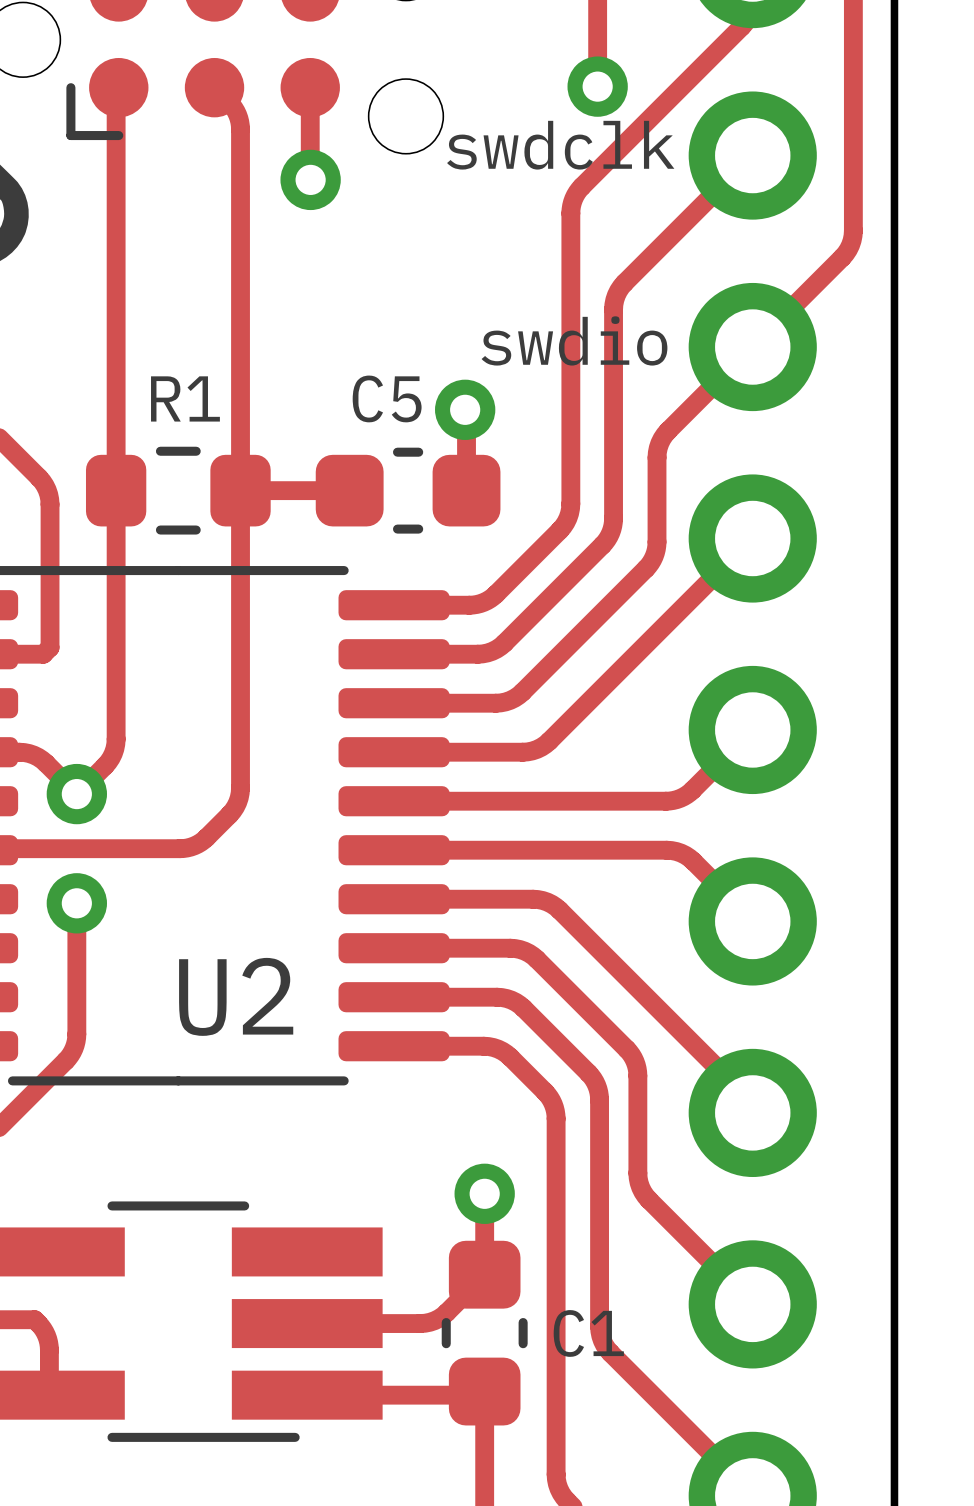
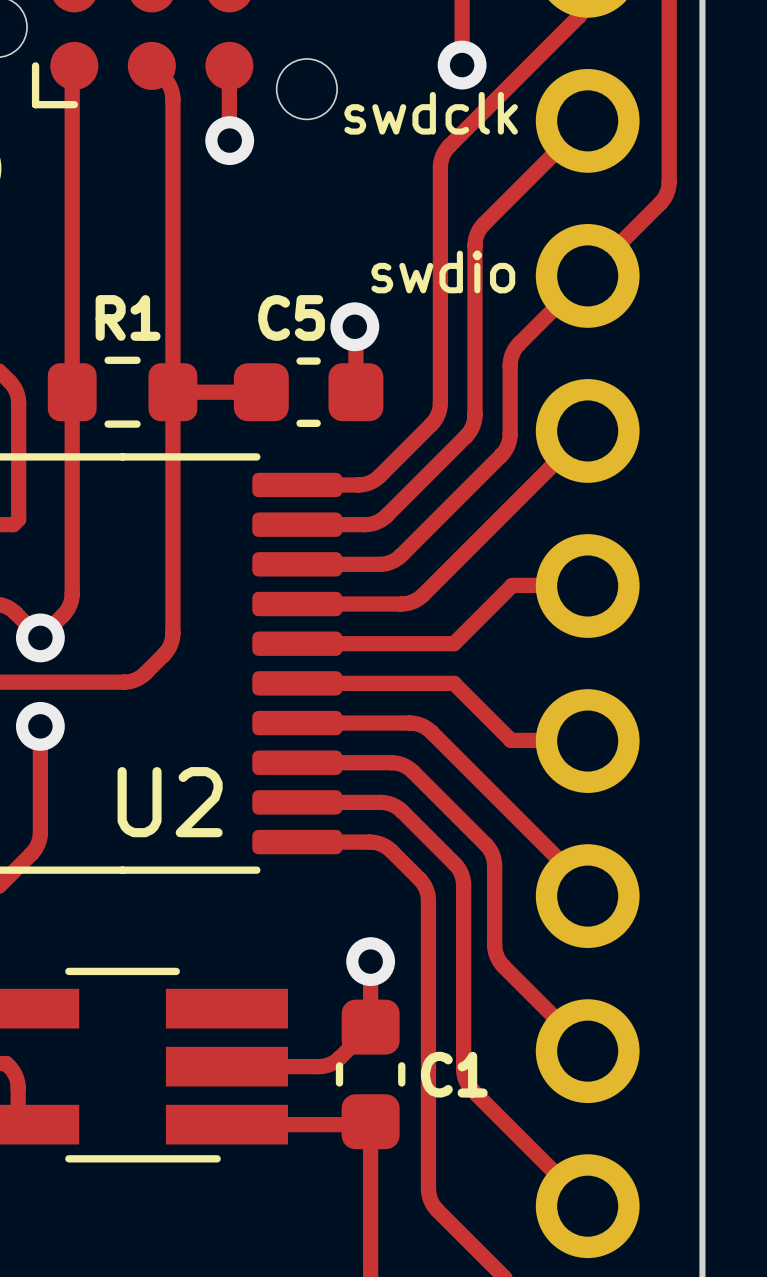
track: (752, 729) (692, 790) (680, 798) (665, 801) (587, 801) -> (587, 585) (512, 585) (454, 643)
track: (587, 850) (666, 850) (681, 853) (693, 861) (752, 920) -> (454, 683) (511, 740) (587, 740)

